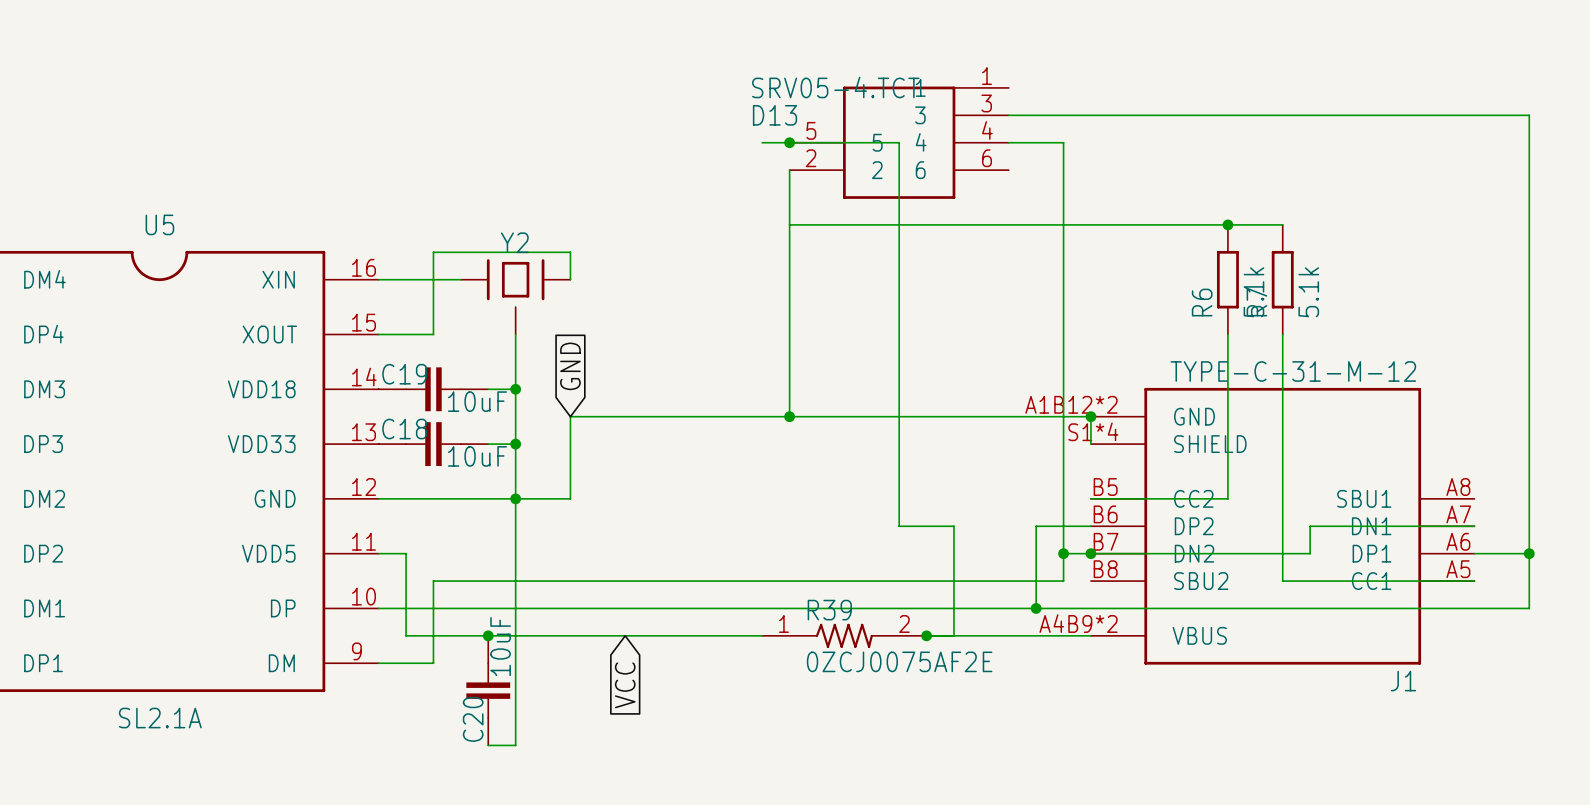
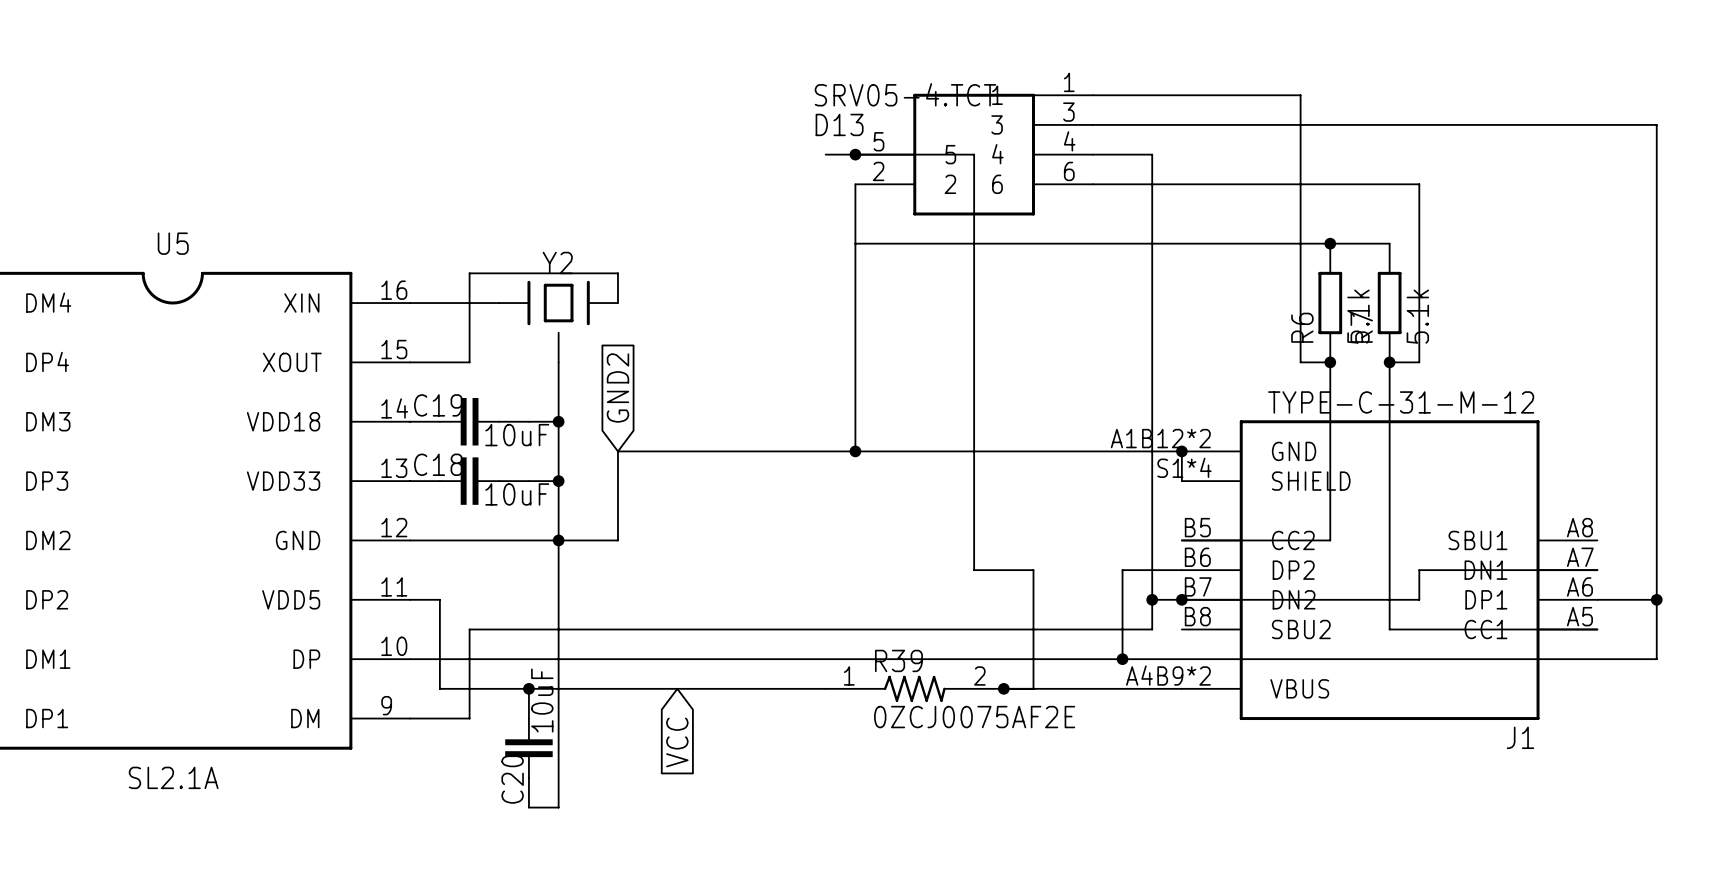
wire: none -> (1092, 95) (1300, 95) (1300, 362) (1330, 362)
wire: none -> (1092, 184) (1419, 184) (1419, 362) (1389, 362)
junction: none -> (1330, 362)
junction: none -> (1389, 362)
global label: GND (570, 366) -> GND2 (617, 388)

